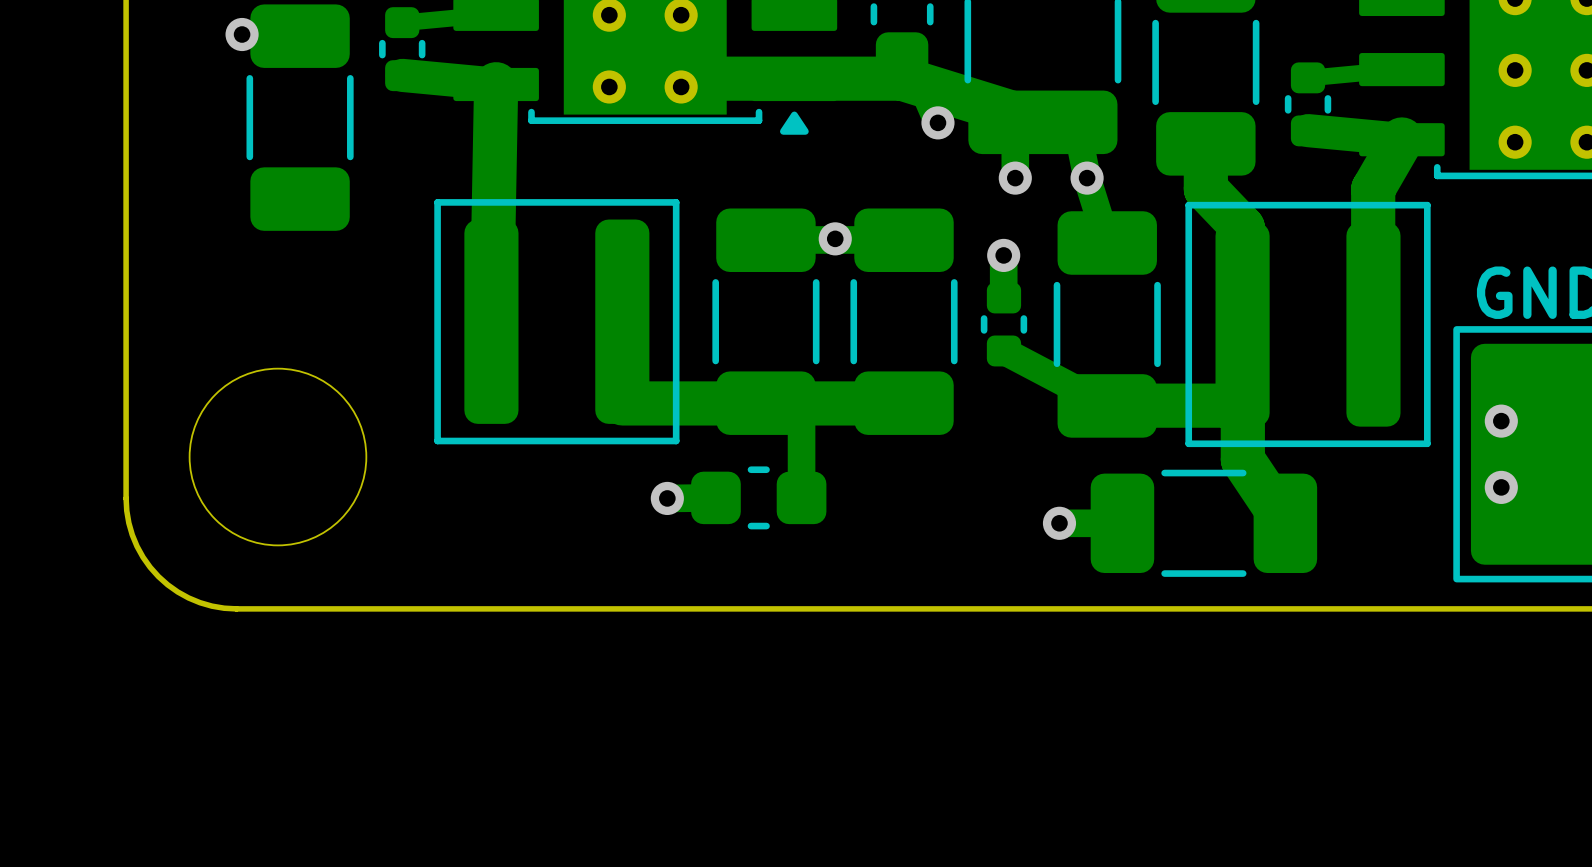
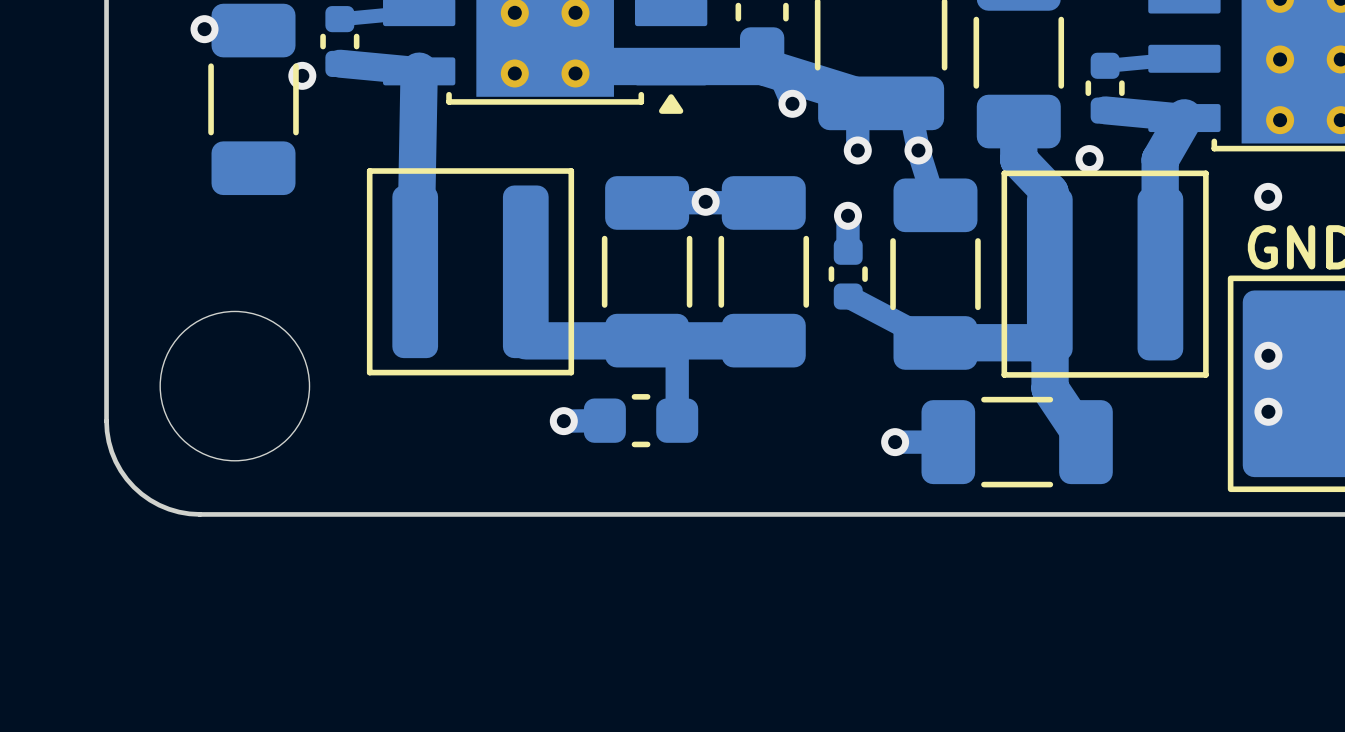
via: none -> (302, 75)
via: none -> (1089, 159)
via: none -> (1268, 196)

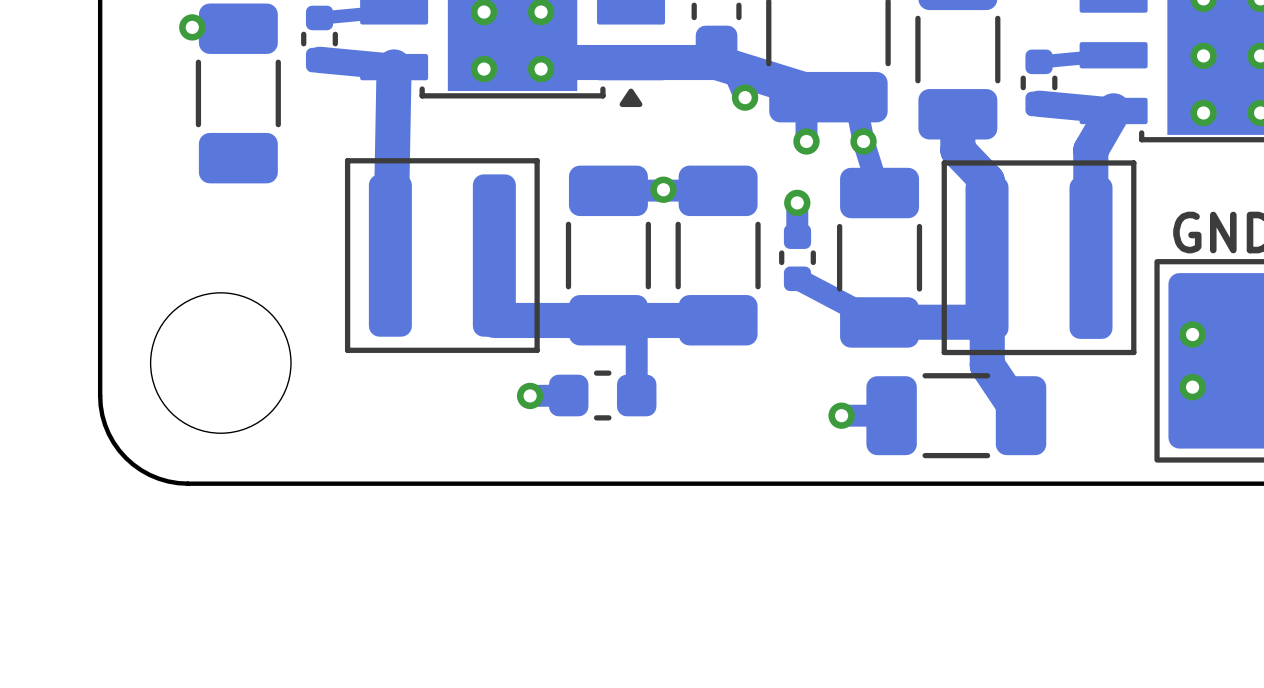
via: (302, 75) -> none
via: (1089, 159) -> none
via: (1268, 196) -> none

